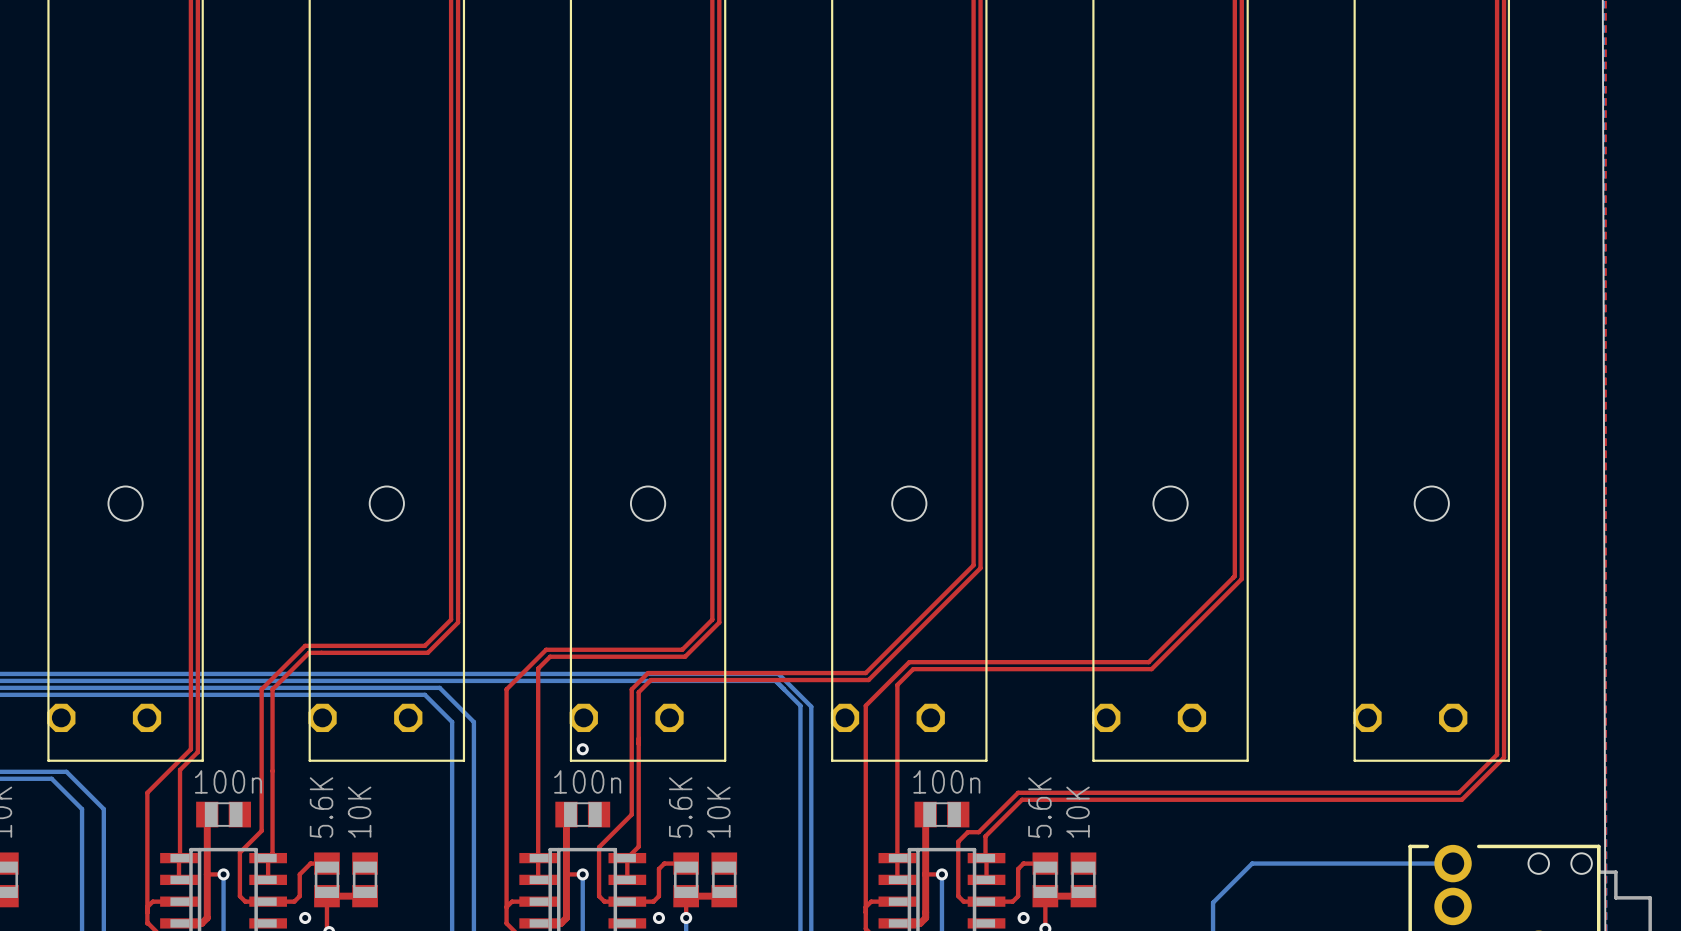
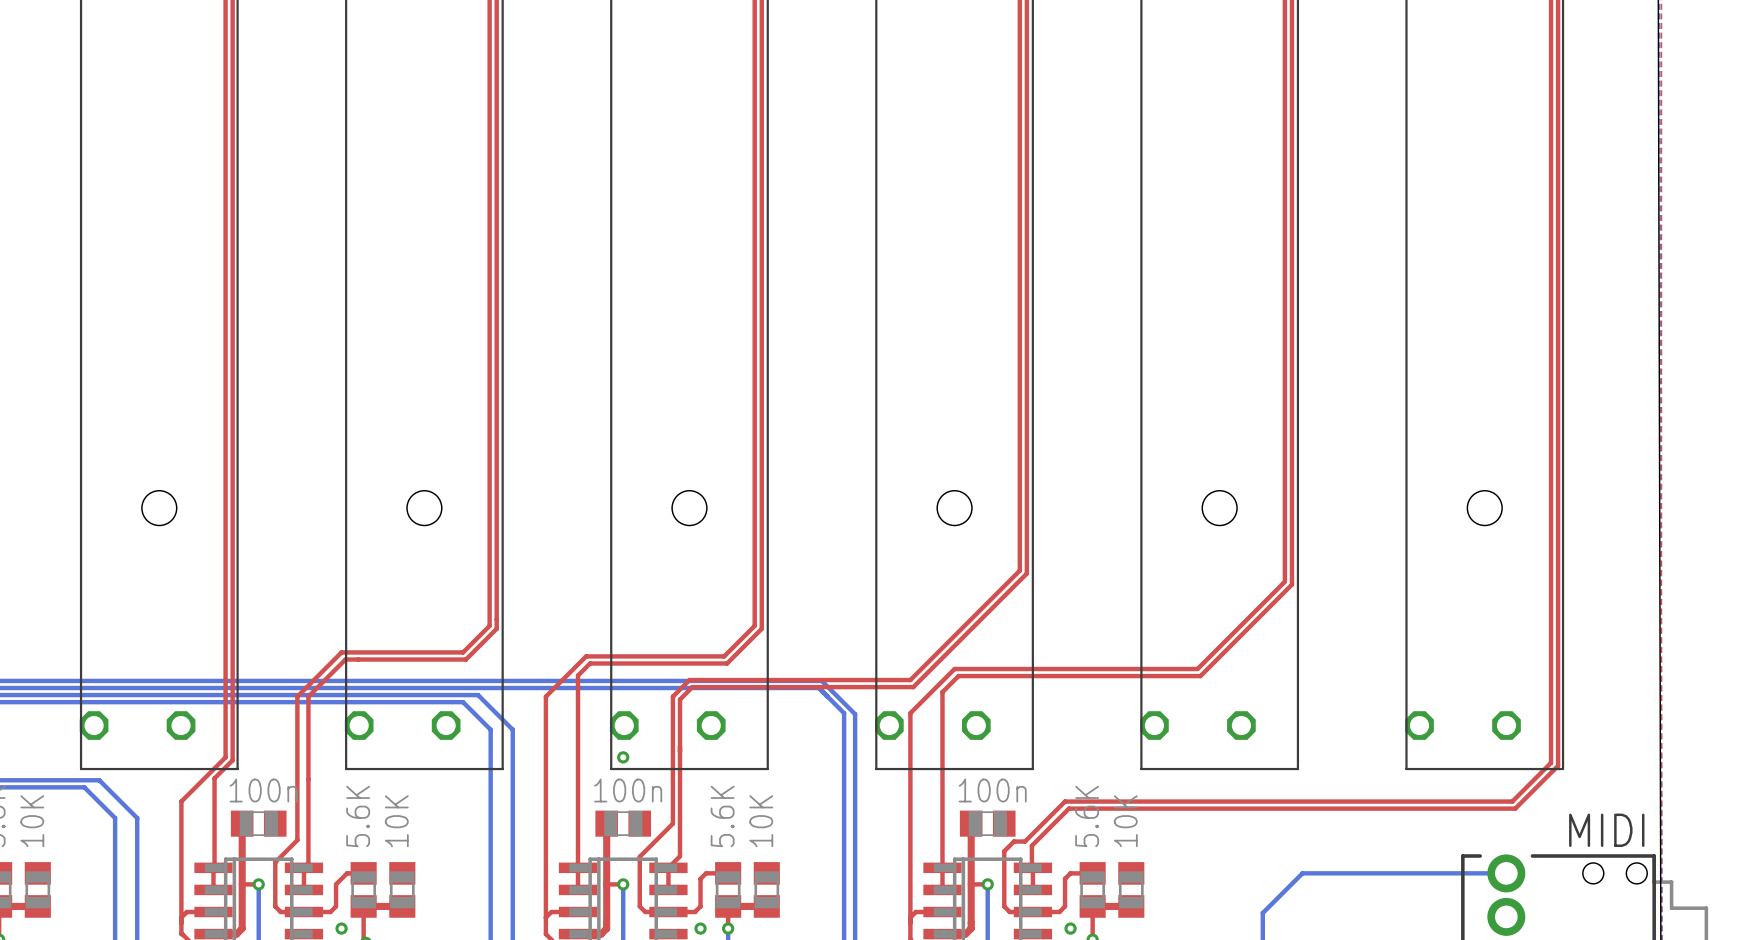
text: none -> MIDI (1606, 830)

